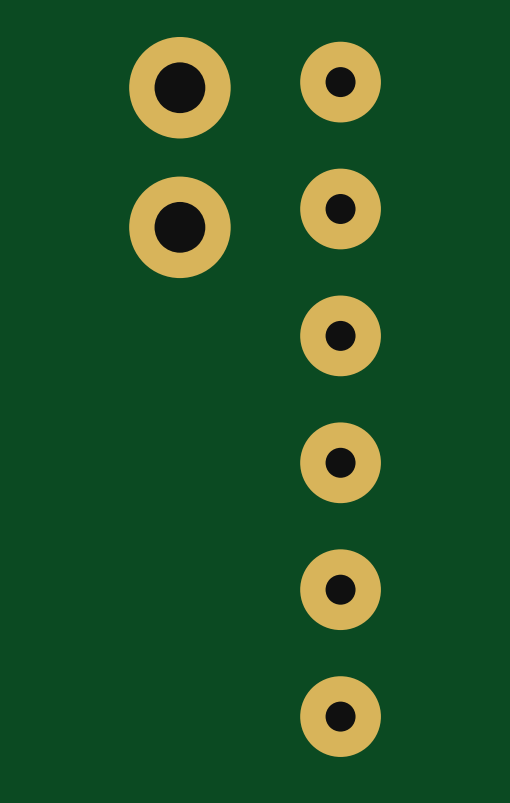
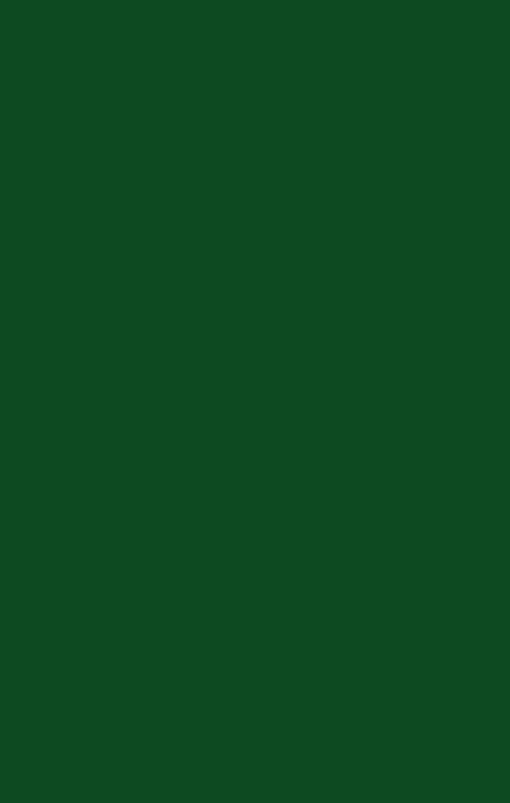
part: (179, 157) -> none
part: (340, 399) -> none

